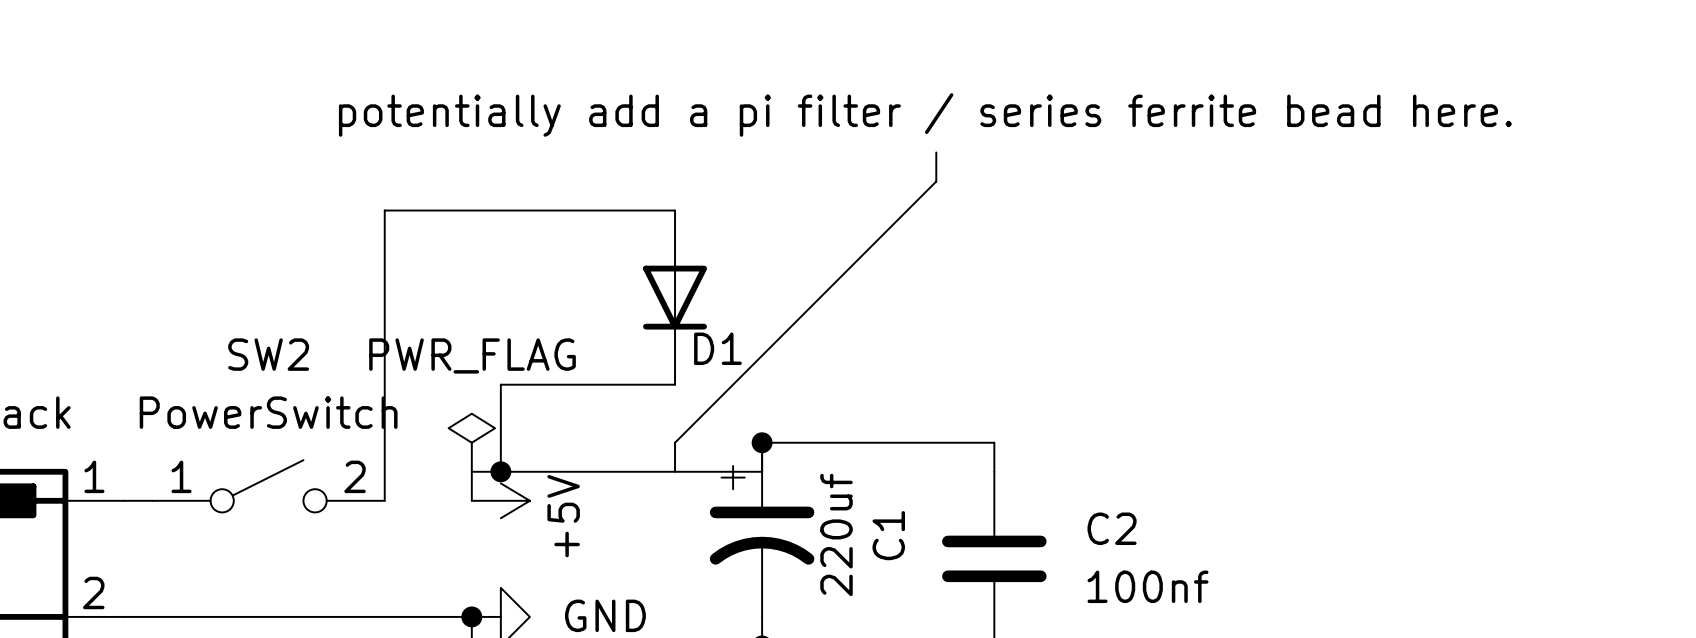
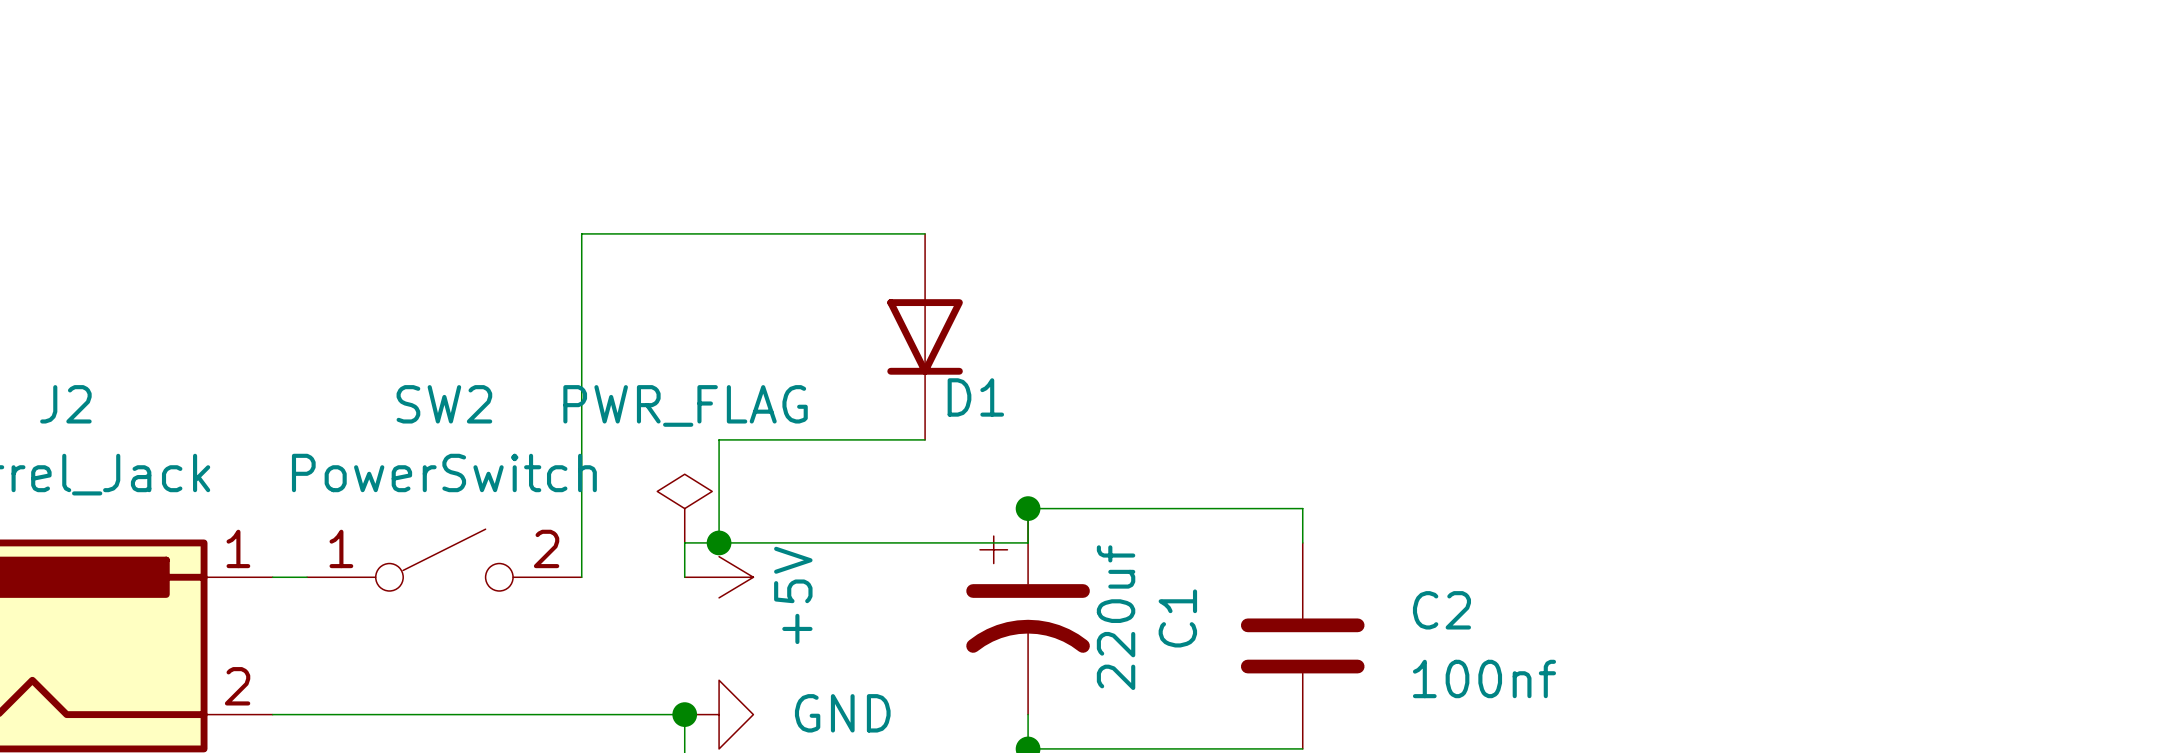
text: potentially add a pi filter / series ferrite bead here. (925, 114) -> none
bus: (936, 152) (936, 181) (675, 442) (675, 471) -> none

